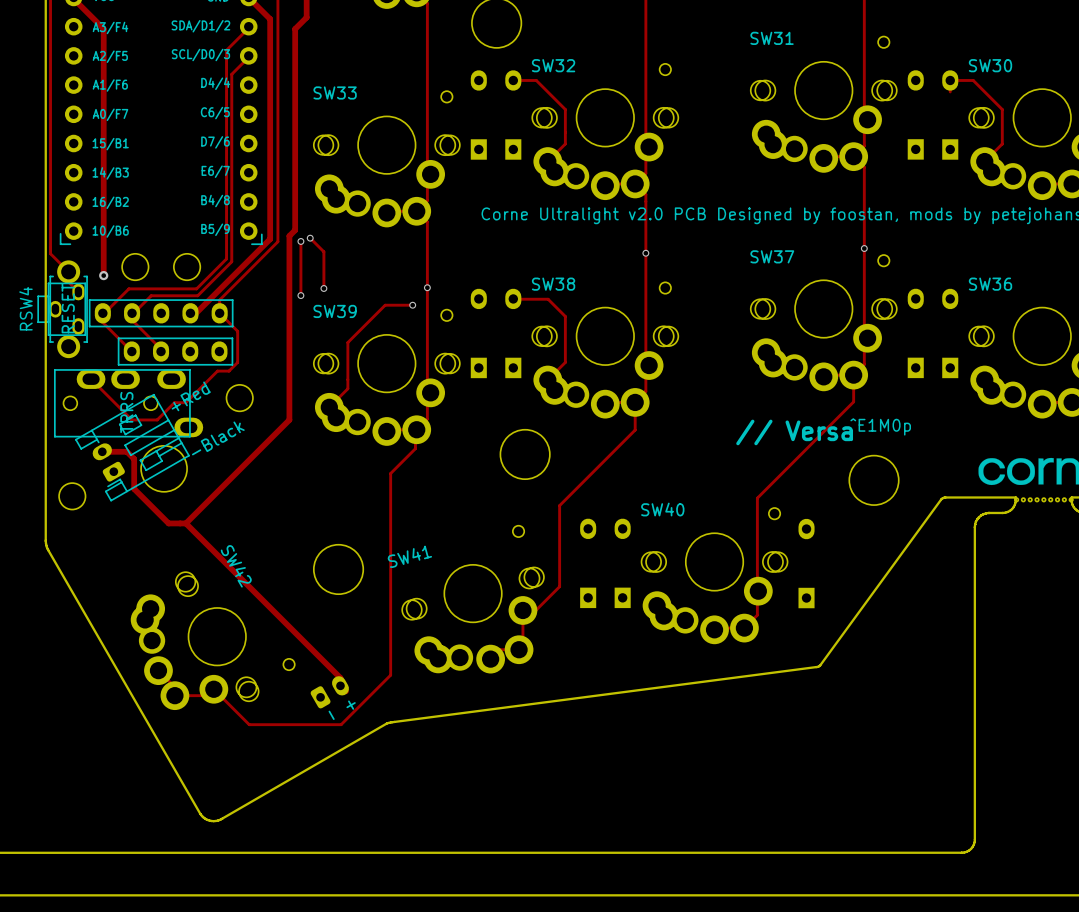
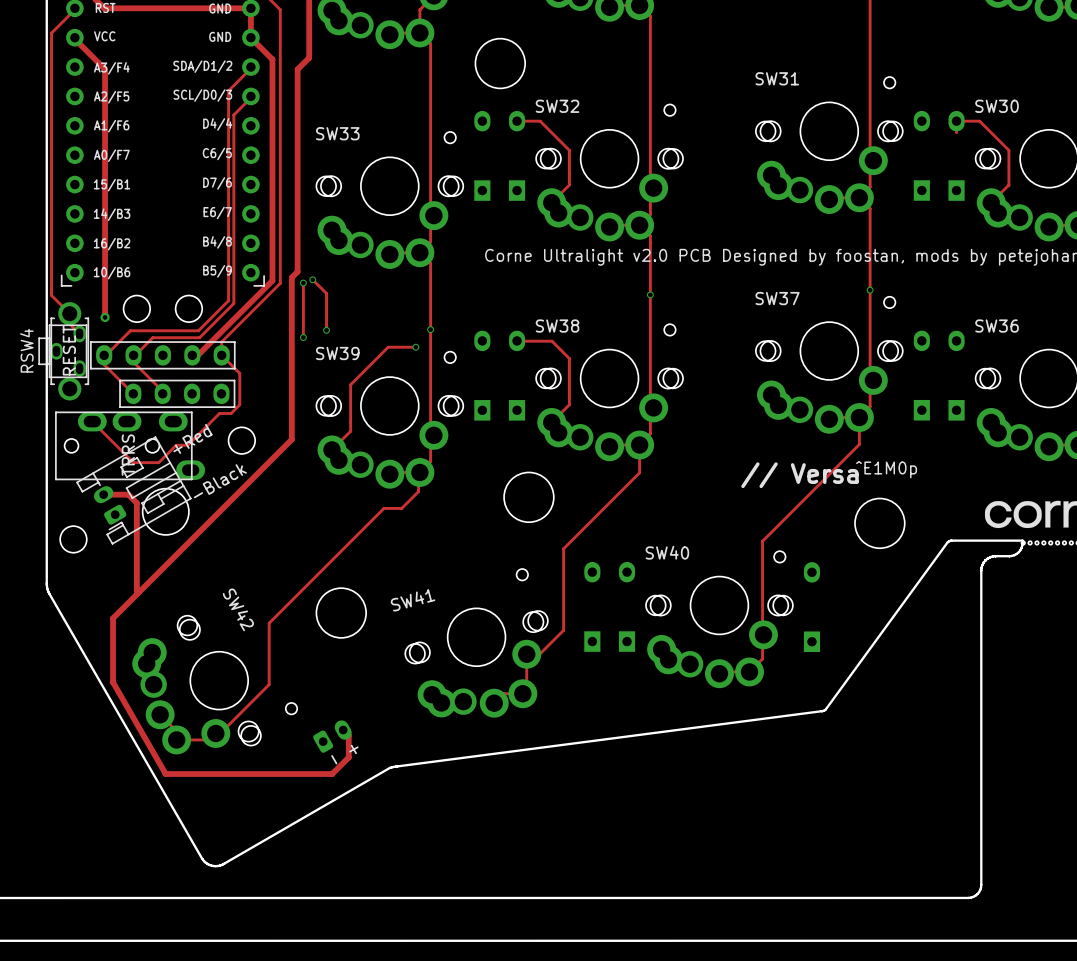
track: (289, 396) (289, 419) (185, 523) -> (291, 439) (113, 618) (113, 682) (165, 773)
track: (134, 459) (134, 488) (168, 523) (185, 523) -> (135, 501) (136, 591) (138, 592)
track: (398, 465) (390, 473) (390, 675) (341, 724) (249, 724) (213, 689) -> (401, 508) (383, 508) (269, 623) (269, 684) (220, 733) (215, 733)
track: (185, 523) (340, 678) (340, 685) -> none
track: none -> (348, 735) (348, 757) (332, 774) (165, 774)

